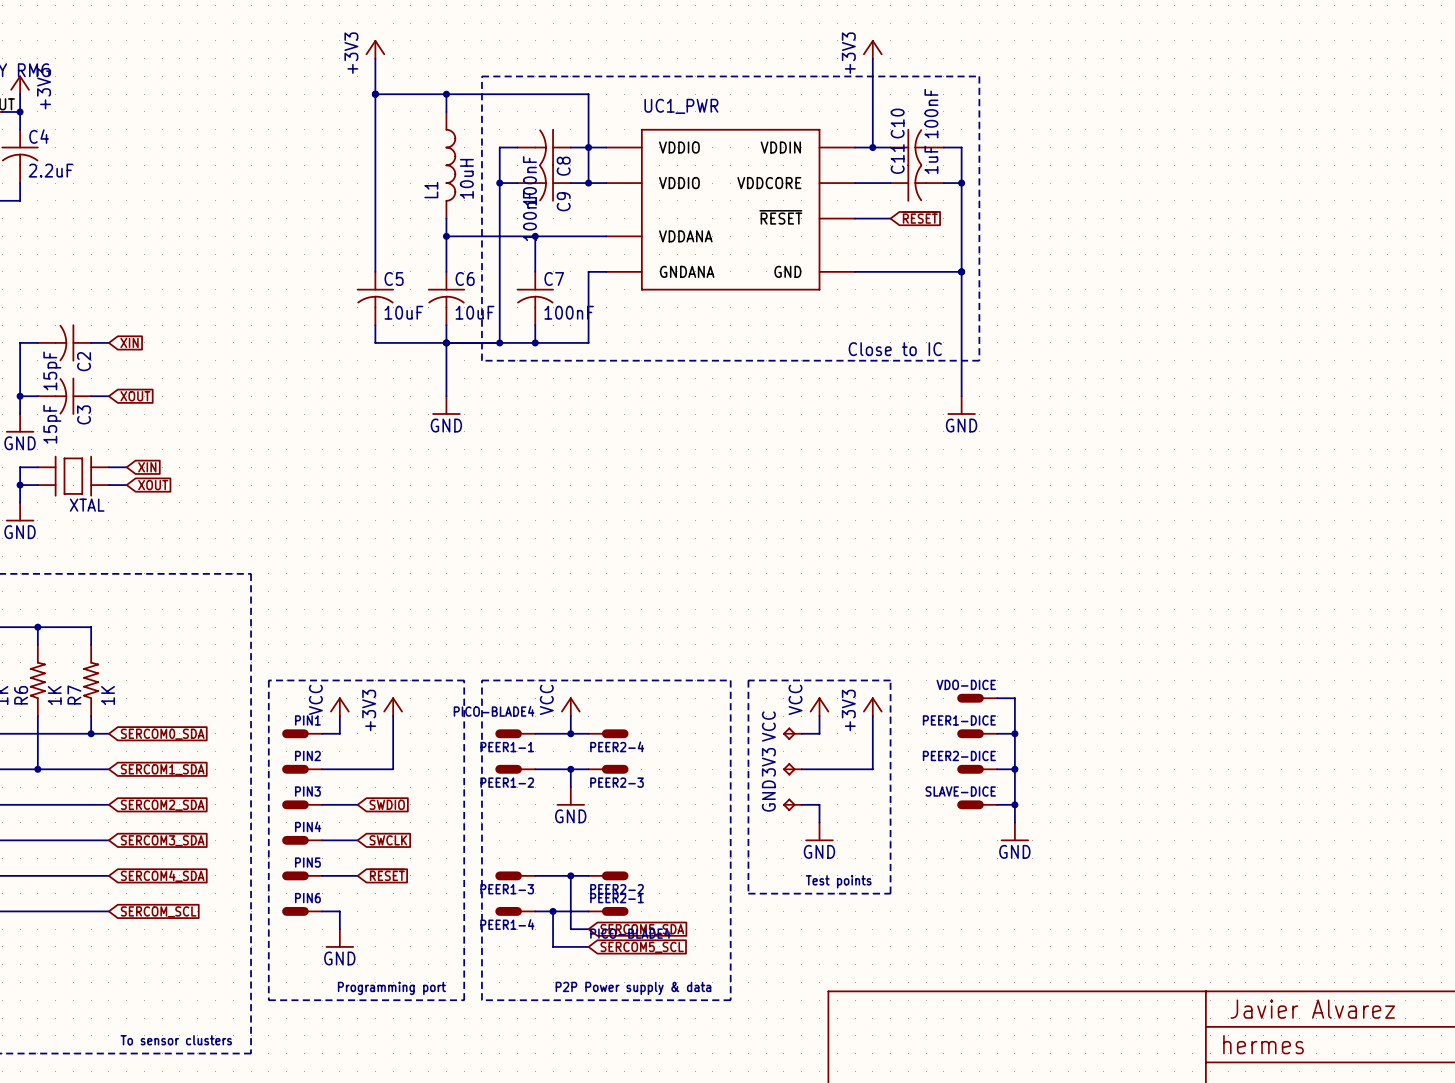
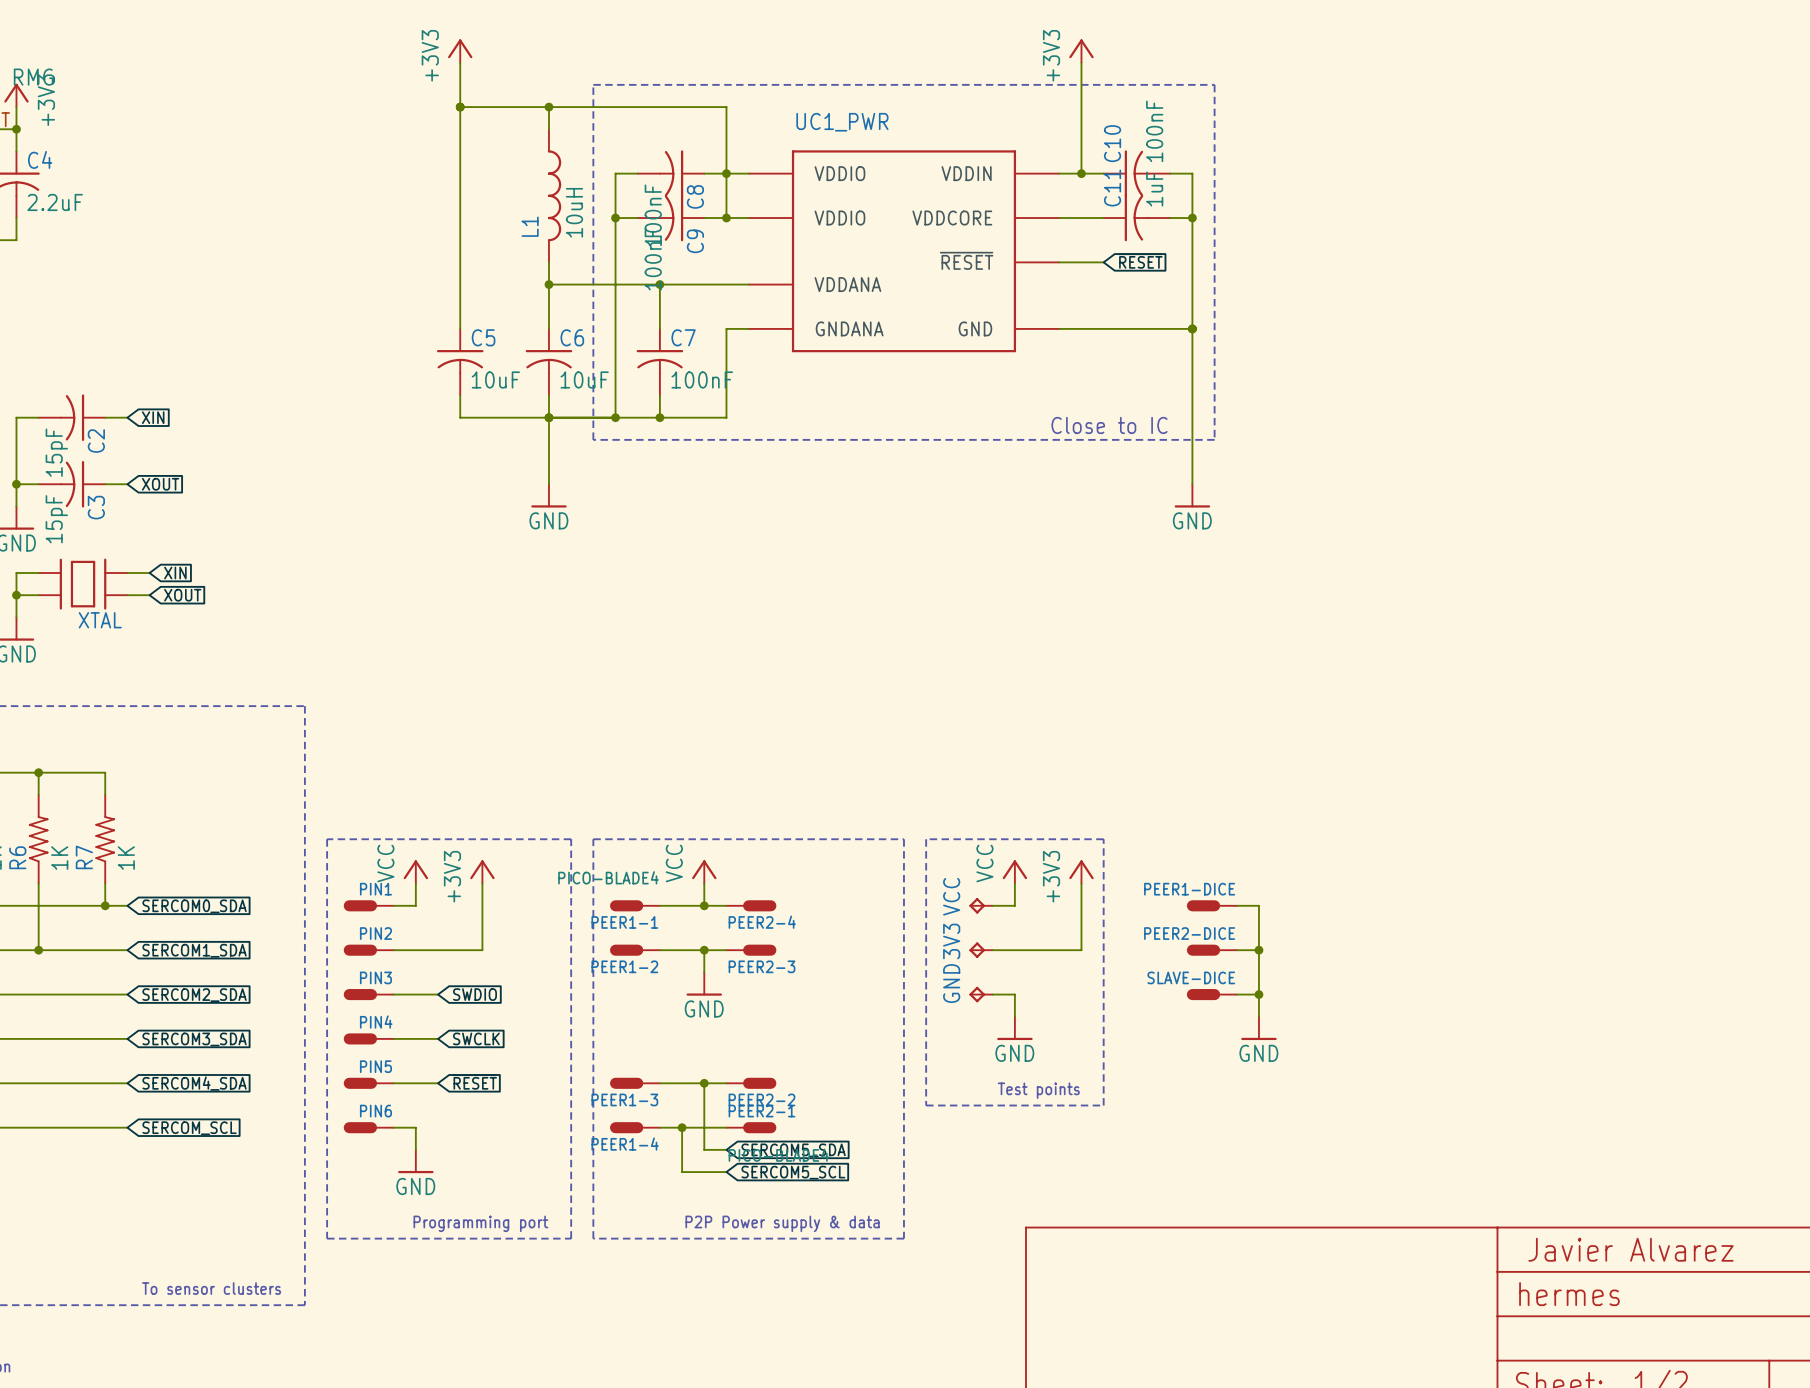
VDO-DICE: (977, 698) -> none
wire: (997, 698) (1014, 698) (1014, 733) -> none
junction: (1014, 733) -> none

